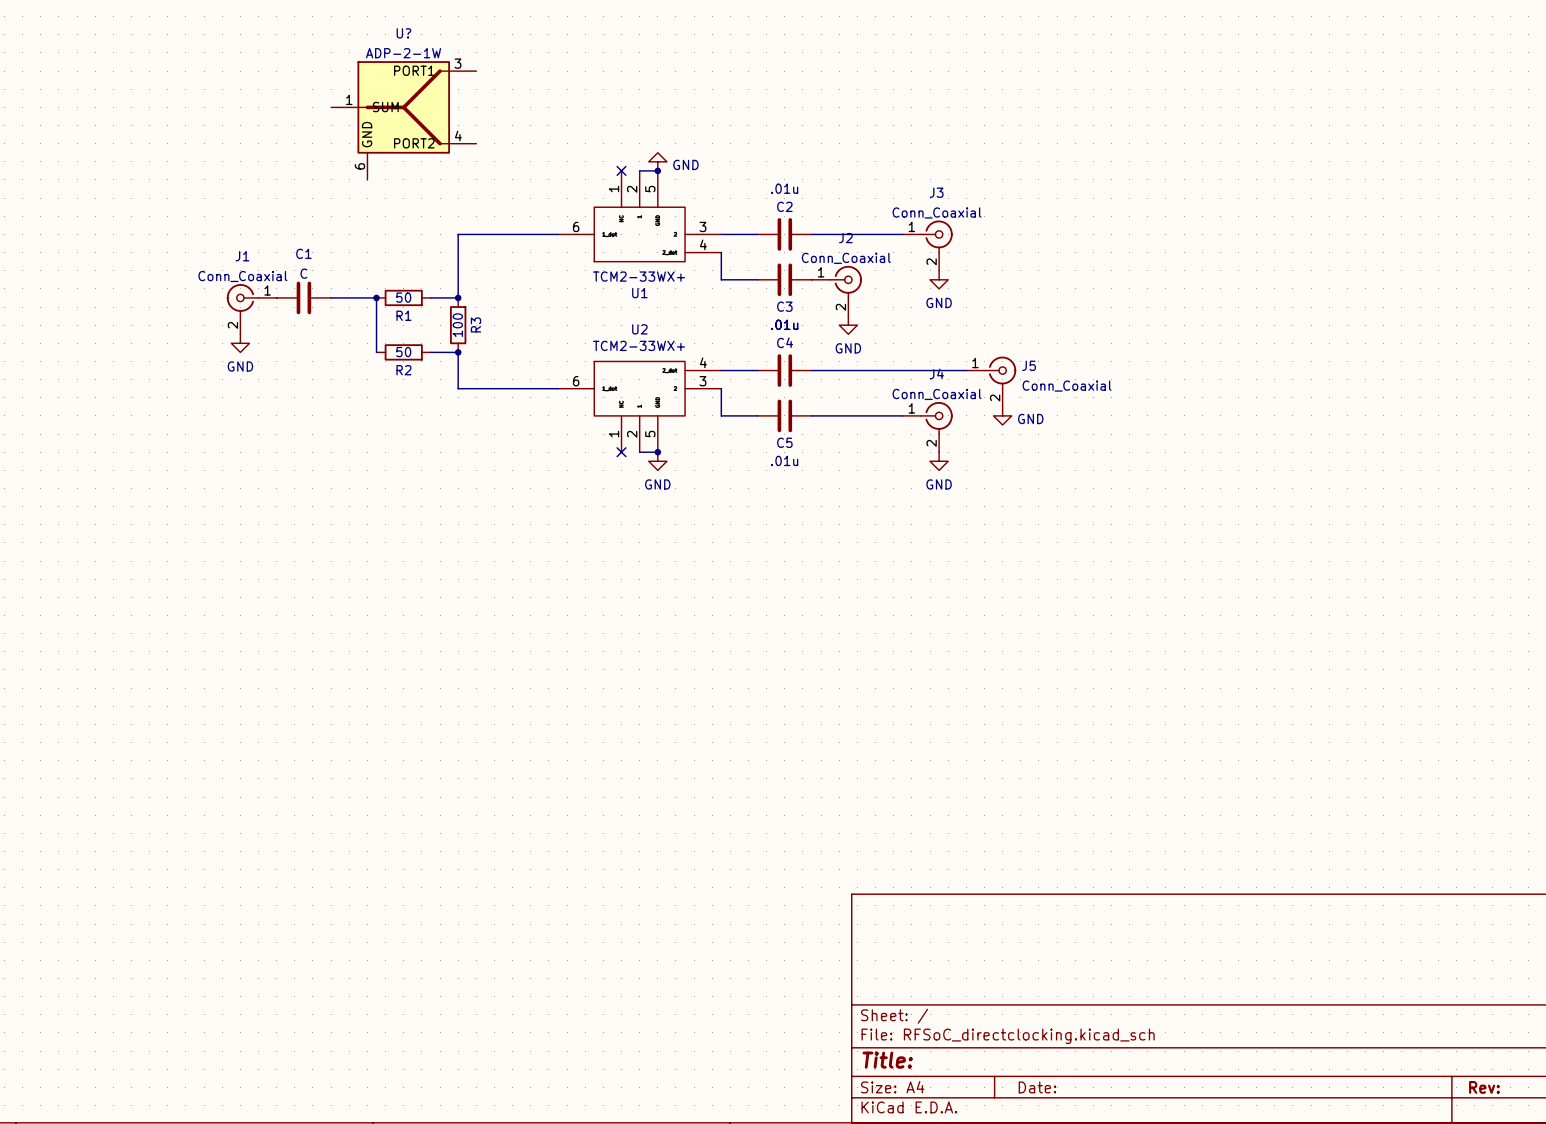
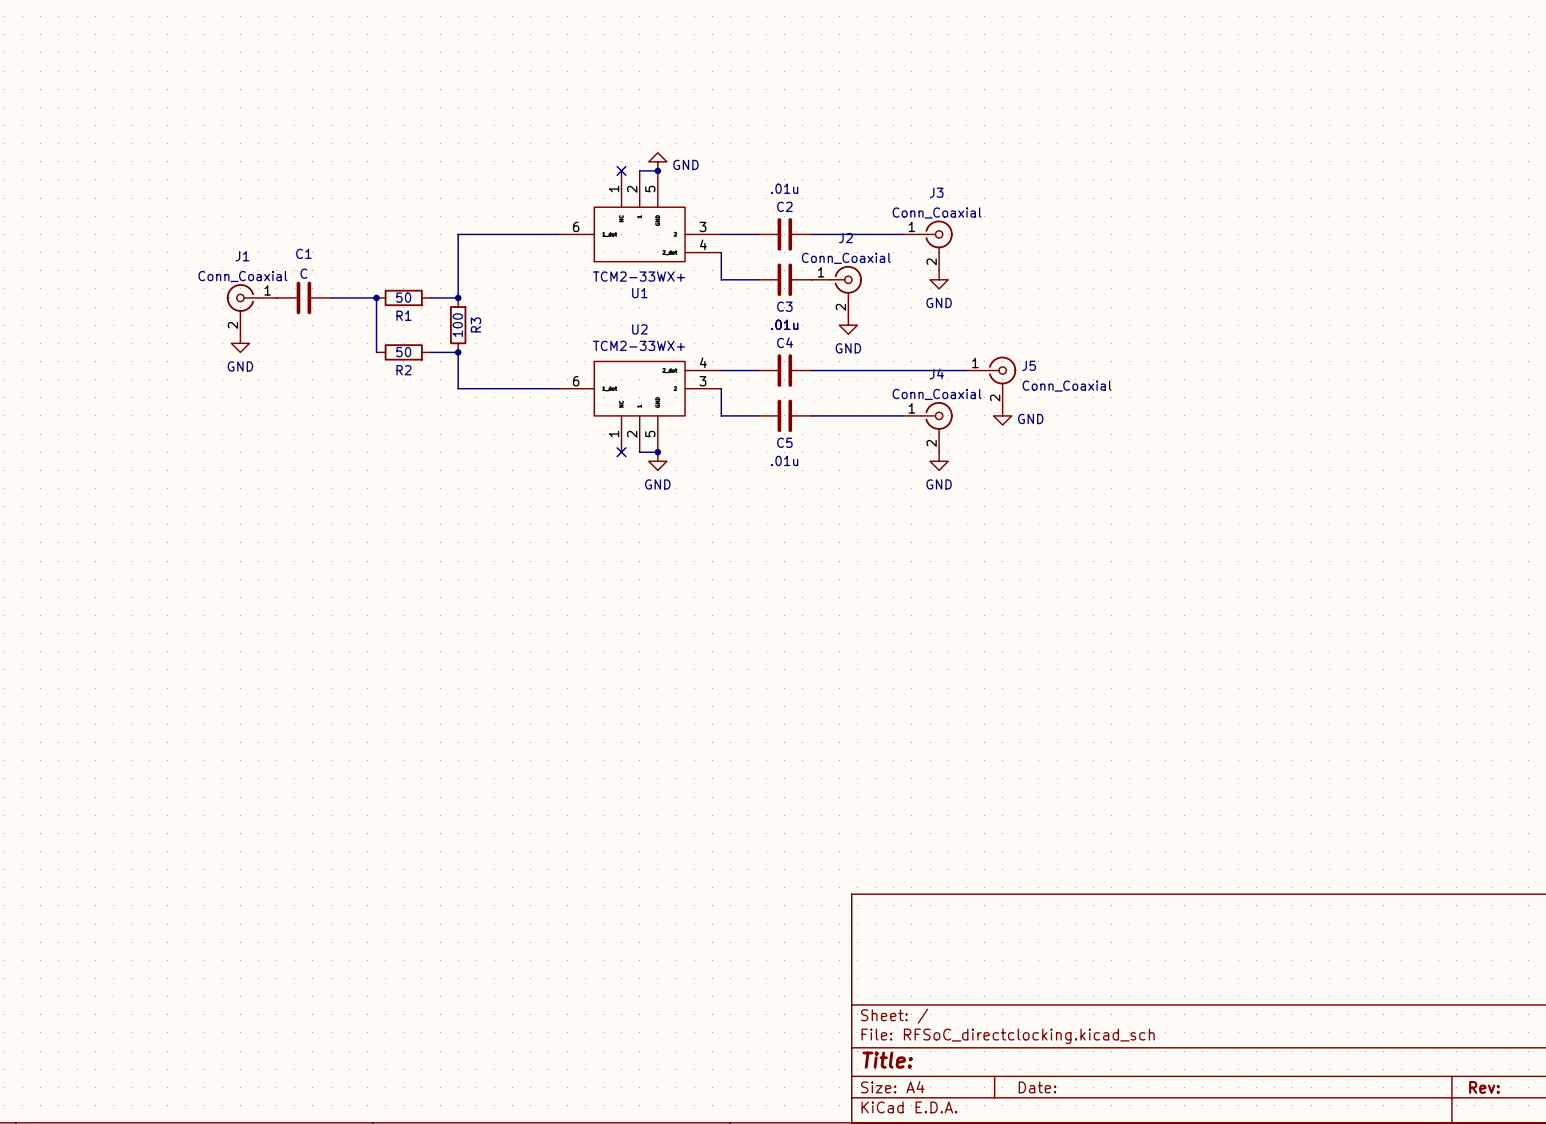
U?: ADP-2-1W (403, 120) -> none

